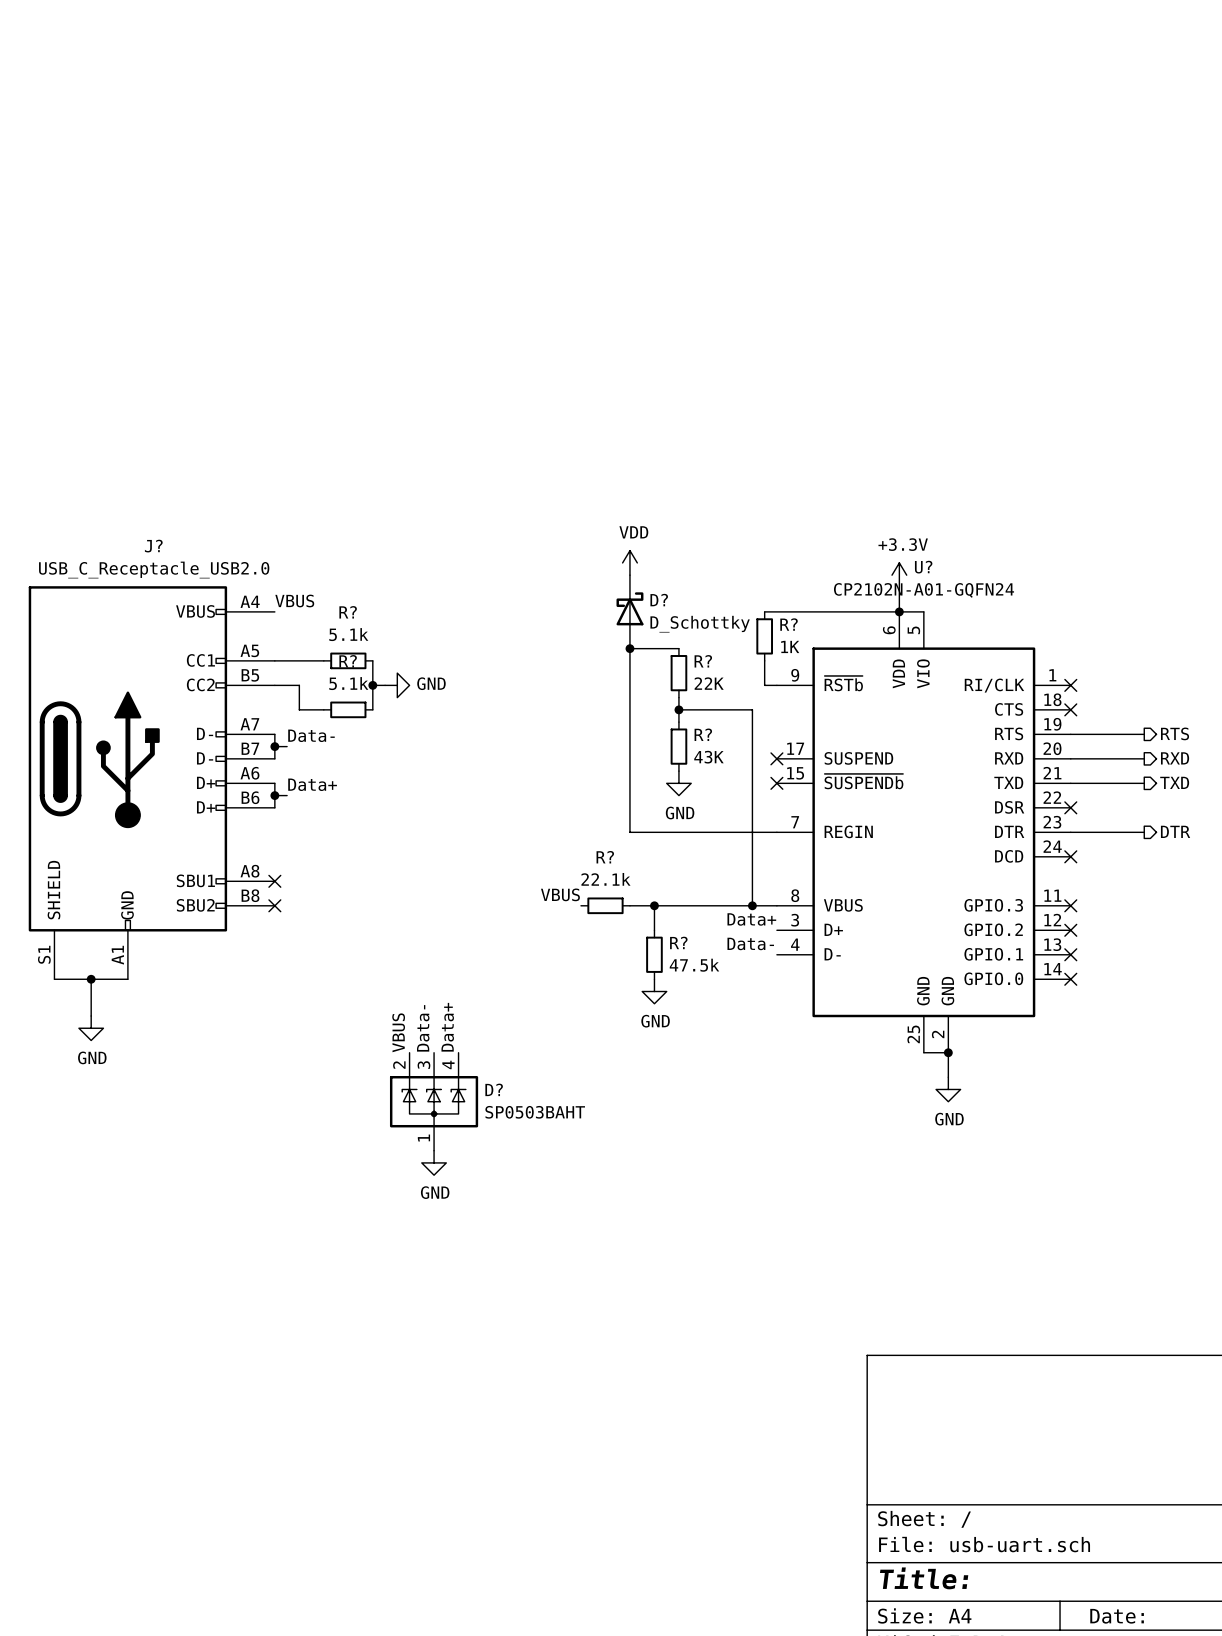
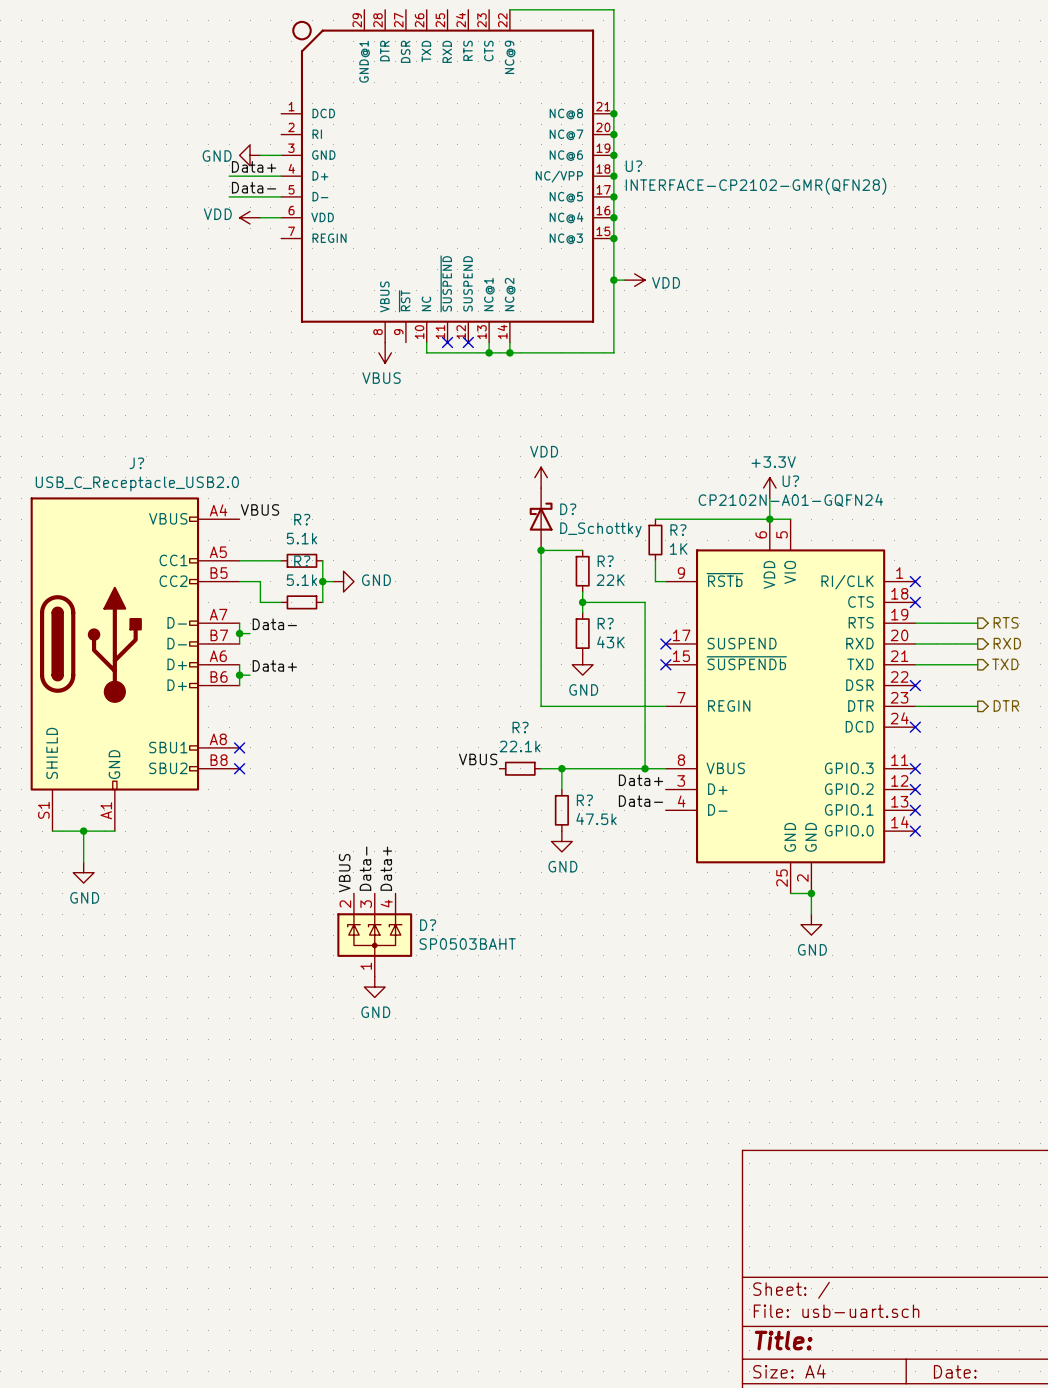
wire: none -> (509, 9) (613, 9) (613, 352) (426, 352) (426, 342)
junction: none -> (613, 113)
junction: none -> (613, 134)
power symbol: none -> GND (250, 155)
wire: none -> (260, 155) (281, 155)
junction: none -> (613, 155)
label: none -> Data+ (254, 166)
wire: none -> (229, 176) (281, 176)
U?: none -> INTERFACE-CP2102-GMR(QFN28) (447, 176)
junction: none -> (613, 176)
label: none -> Data- (254, 187)
wire: none -> (229, 196) (281, 196)
junction: none -> (613, 196)
power symbol: none -> VDD (250, 217)
wire: none -> (260, 217) (281, 217)
junction: none -> (613, 217)
junction: none -> (613, 238)
wire: none -> (613, 280) (624, 280)
junction: none -> (613, 280)
power symbol: none -> VDD (634, 280)
no-connect mark: none -> (447, 342)
no-connect mark: none -> (468, 342)
wire: none -> (489, 342) (489, 352)
wire: none -> (509, 342) (509, 352)
power symbol: none -> VBUS (385, 352)
junction: none -> (489, 352)
junction: none -> (509, 352)

